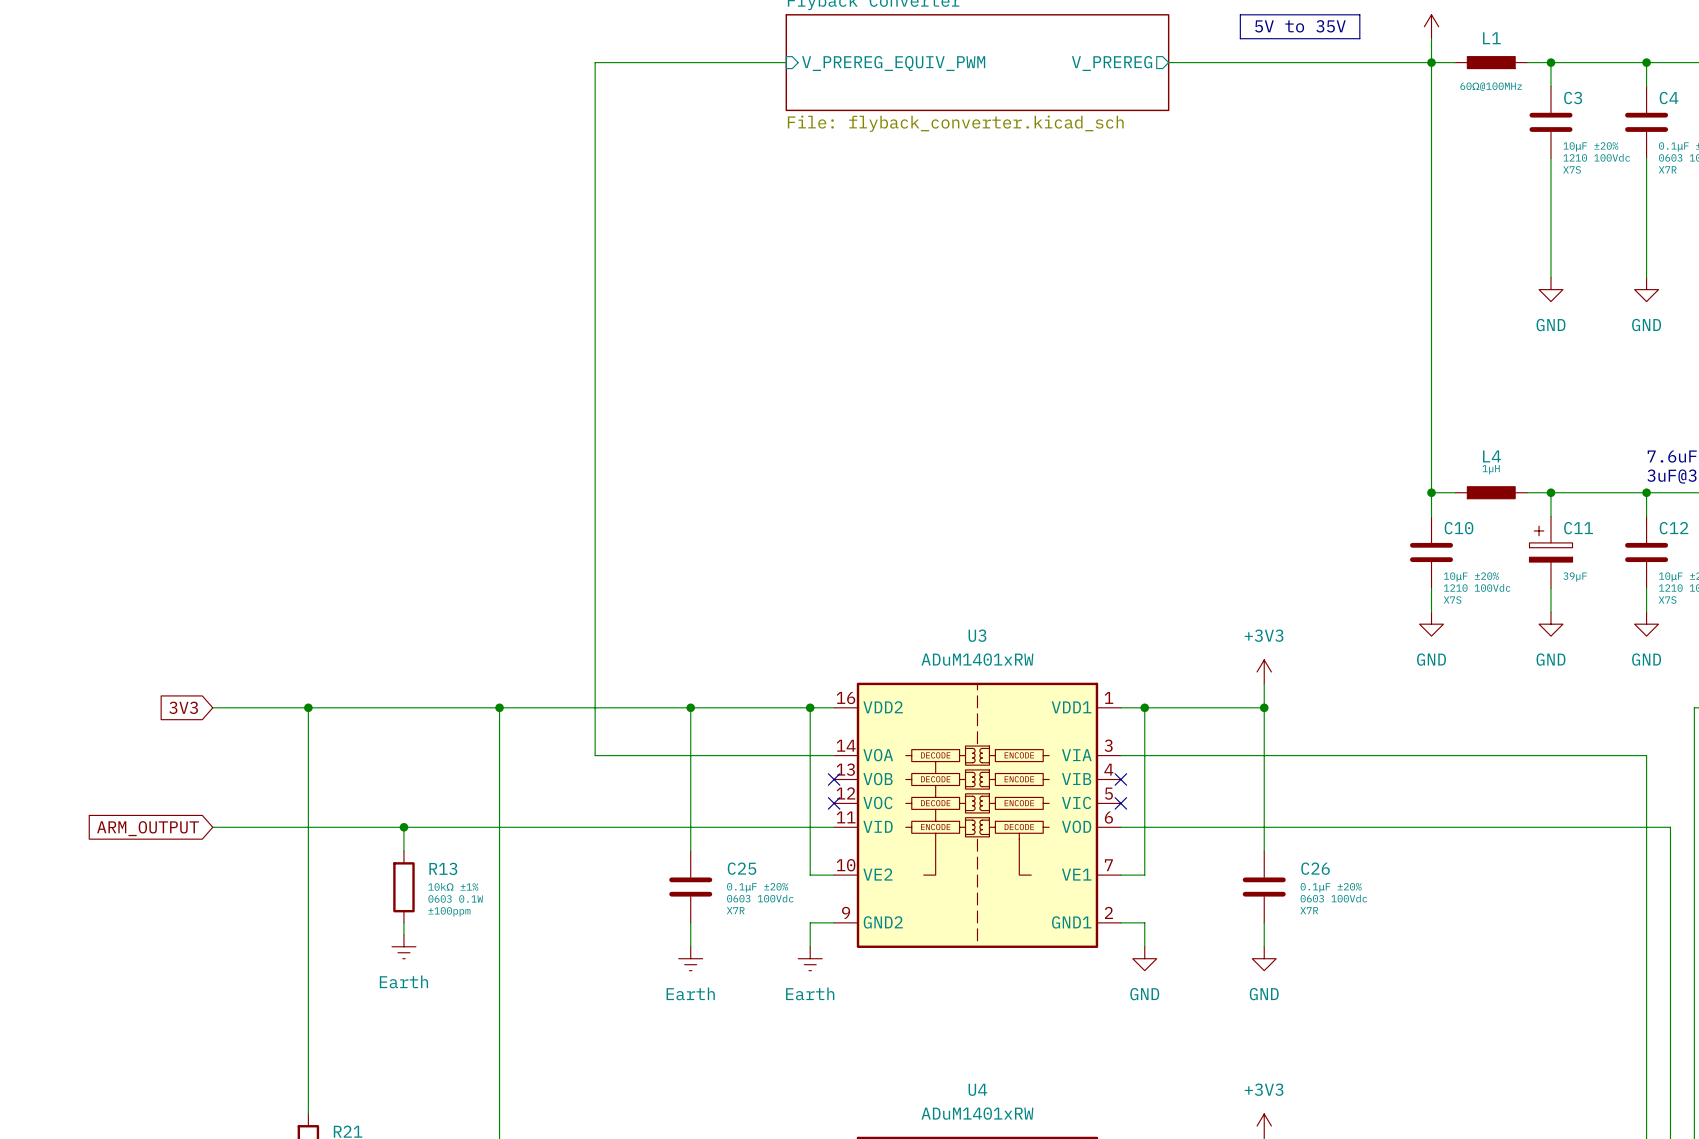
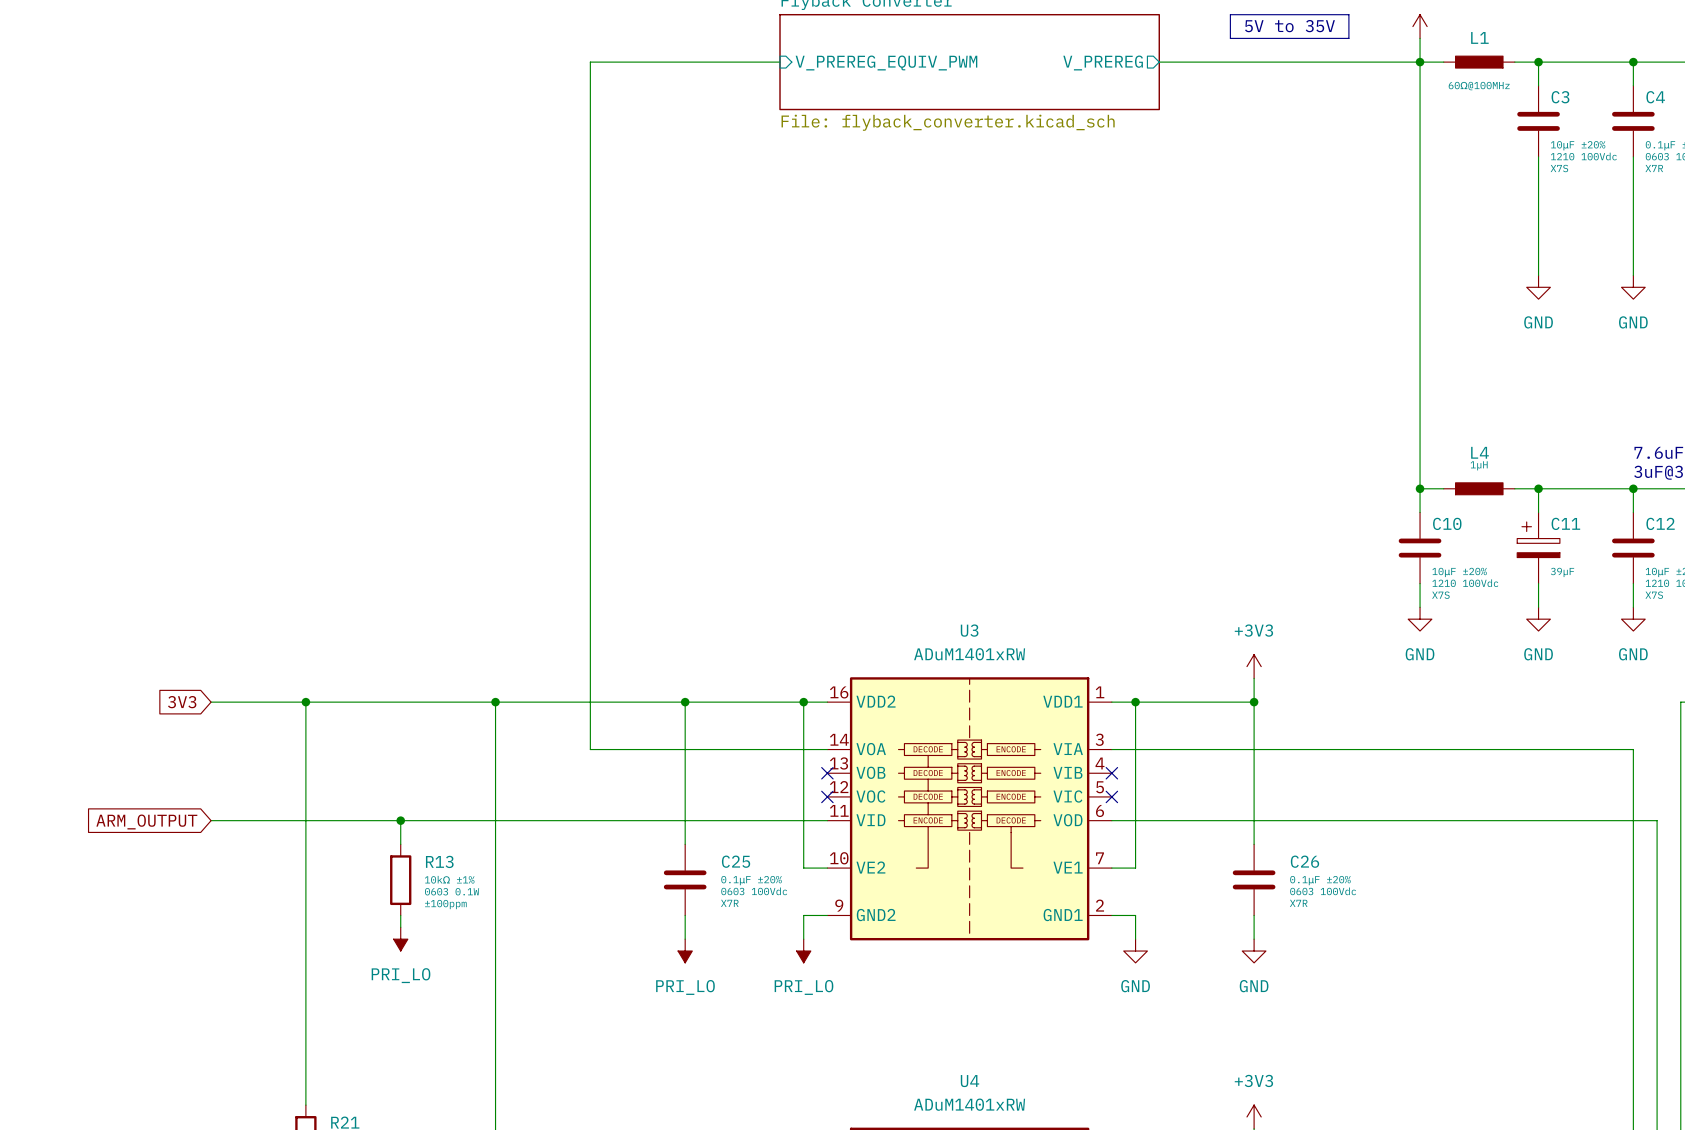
power symbol: Earth (403, 946) -> PRI_LO (400, 939)
power symbol: Earth (690, 958) -> PRI_LO (685, 951)
power symbol: Earth (810, 958) -> PRI_LO (803, 951)

